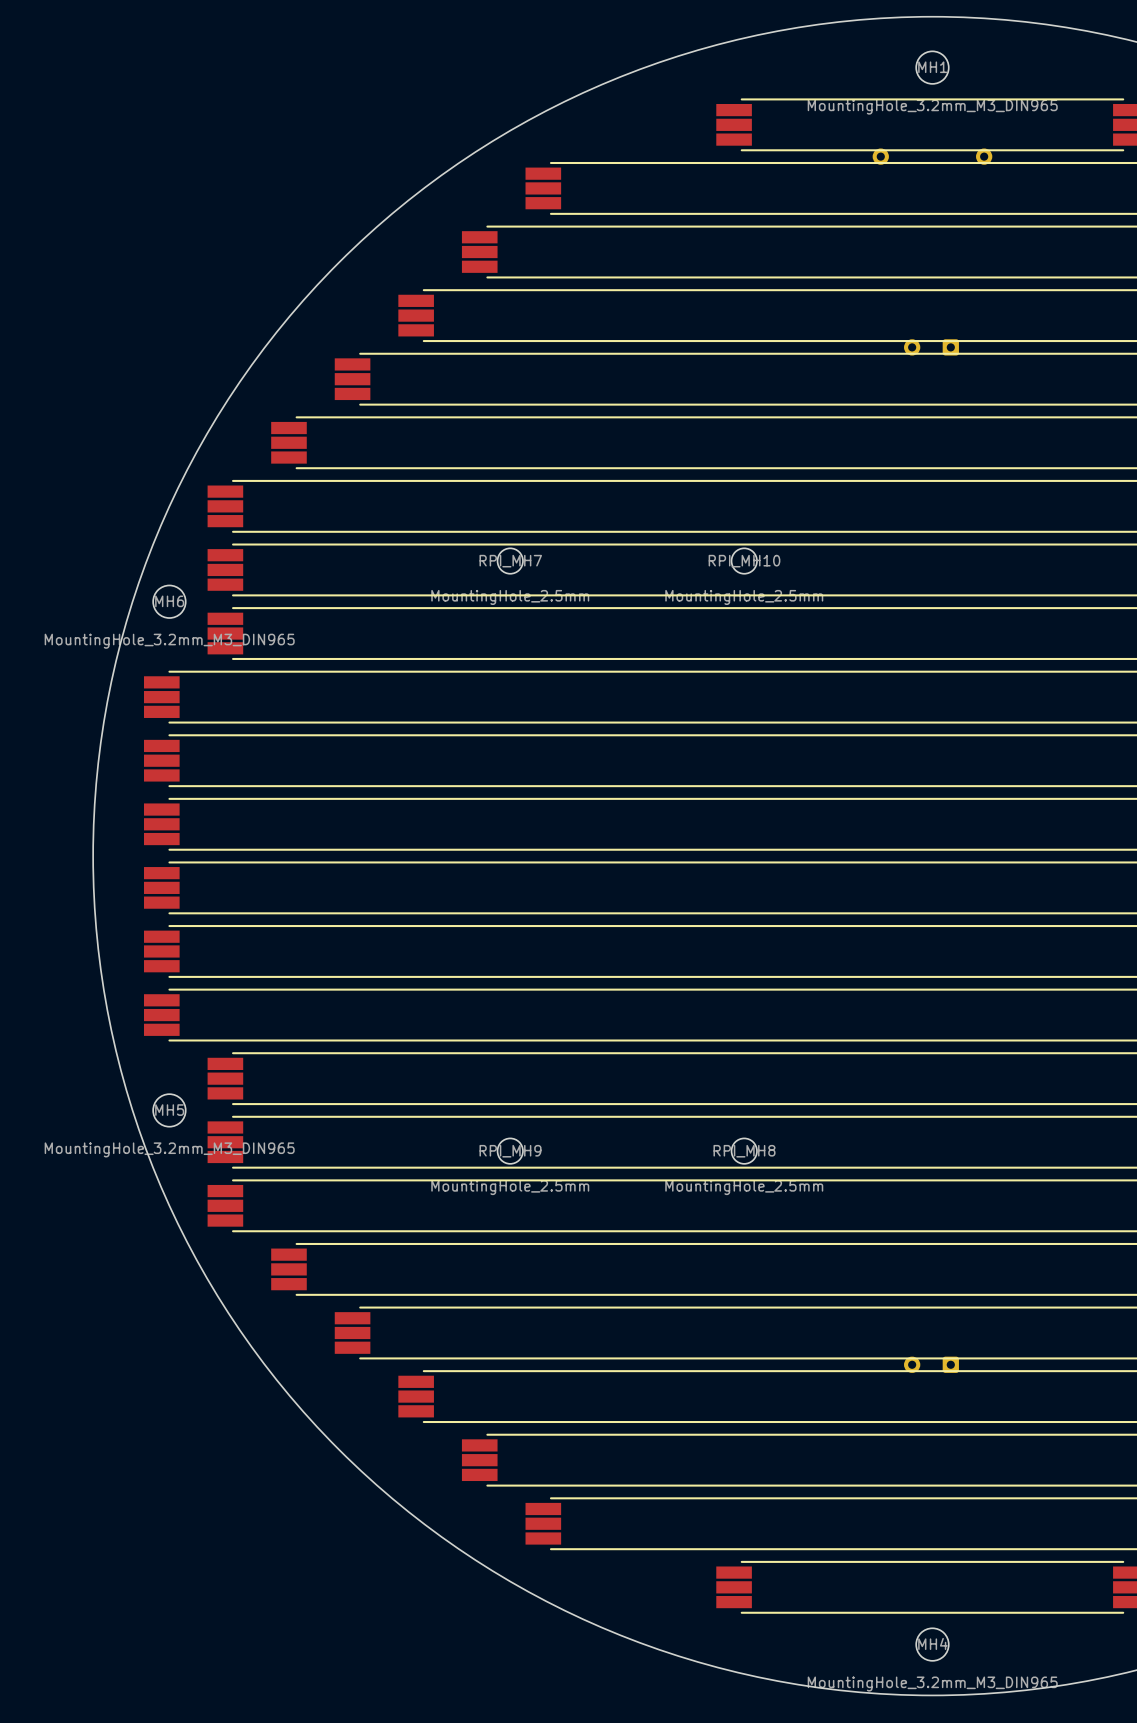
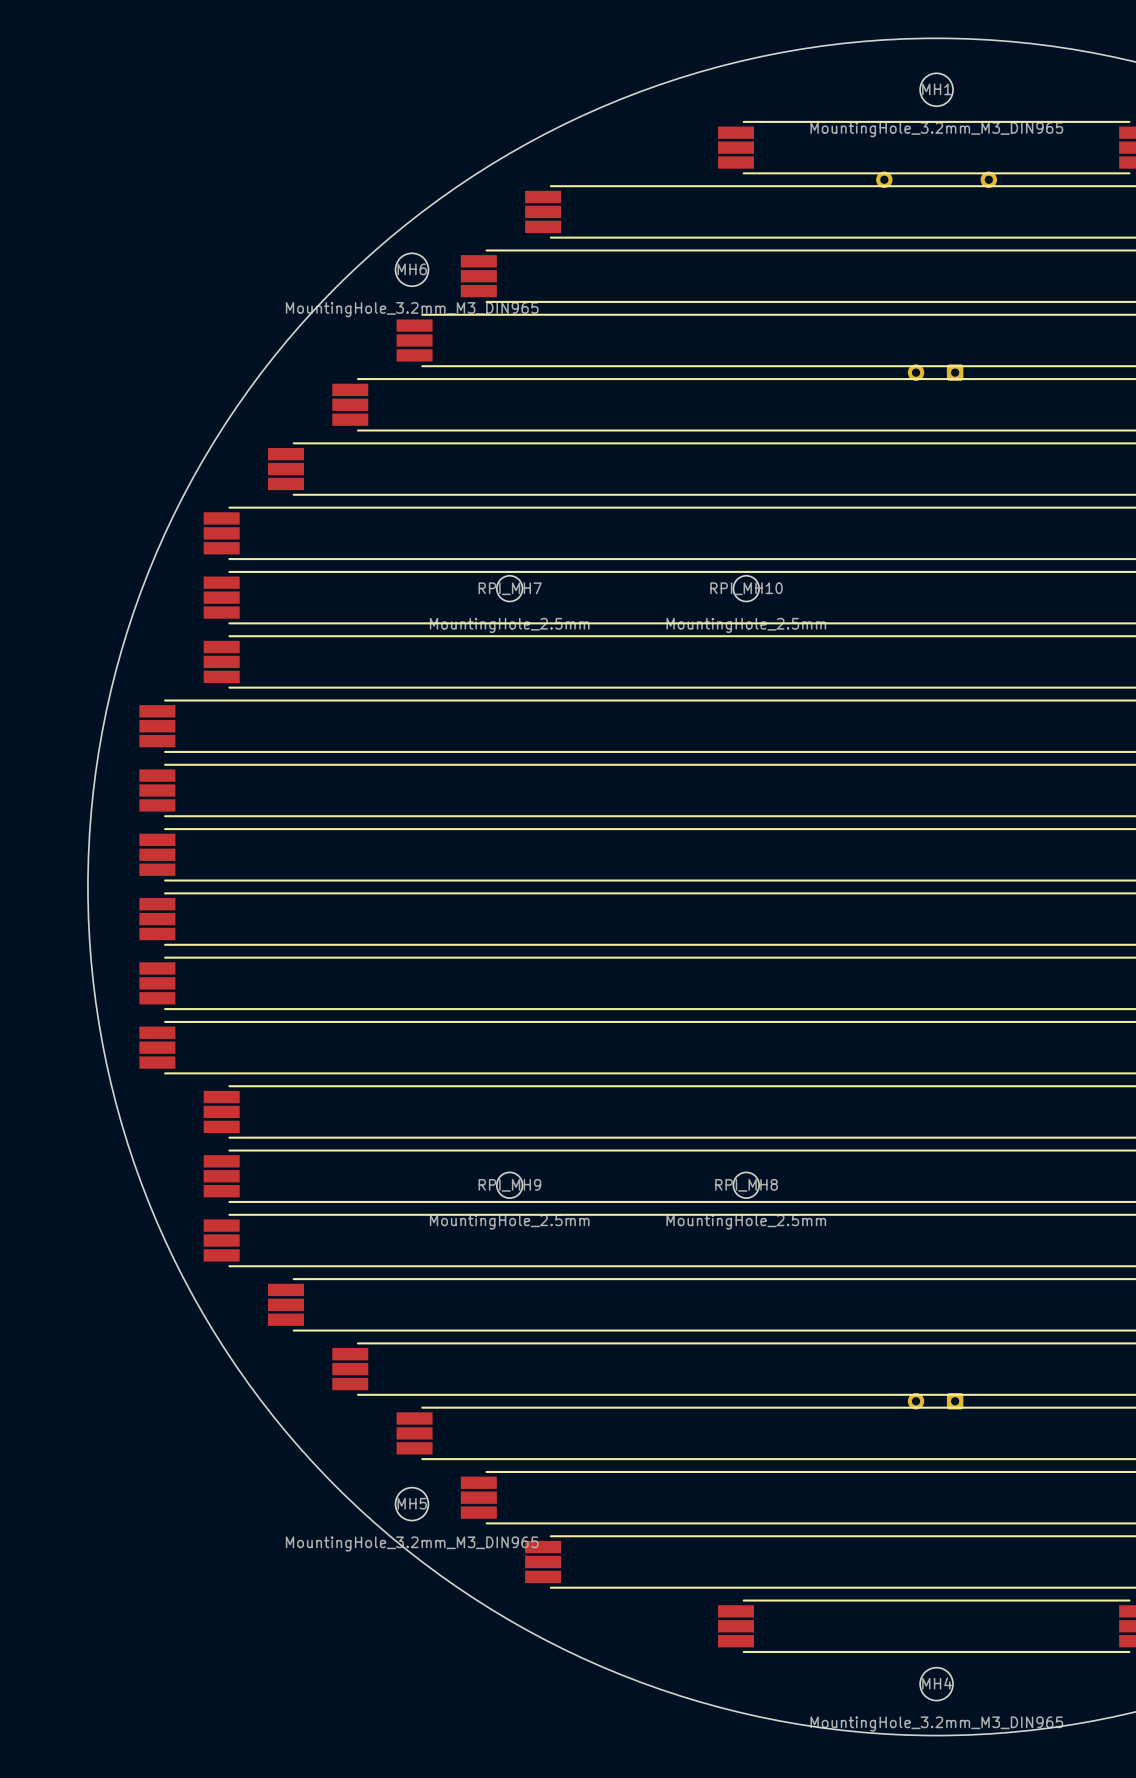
MH6 position: (169, 601) -> (411, 269)
MH5 position: (169, 1110) -> (411, 1504)

